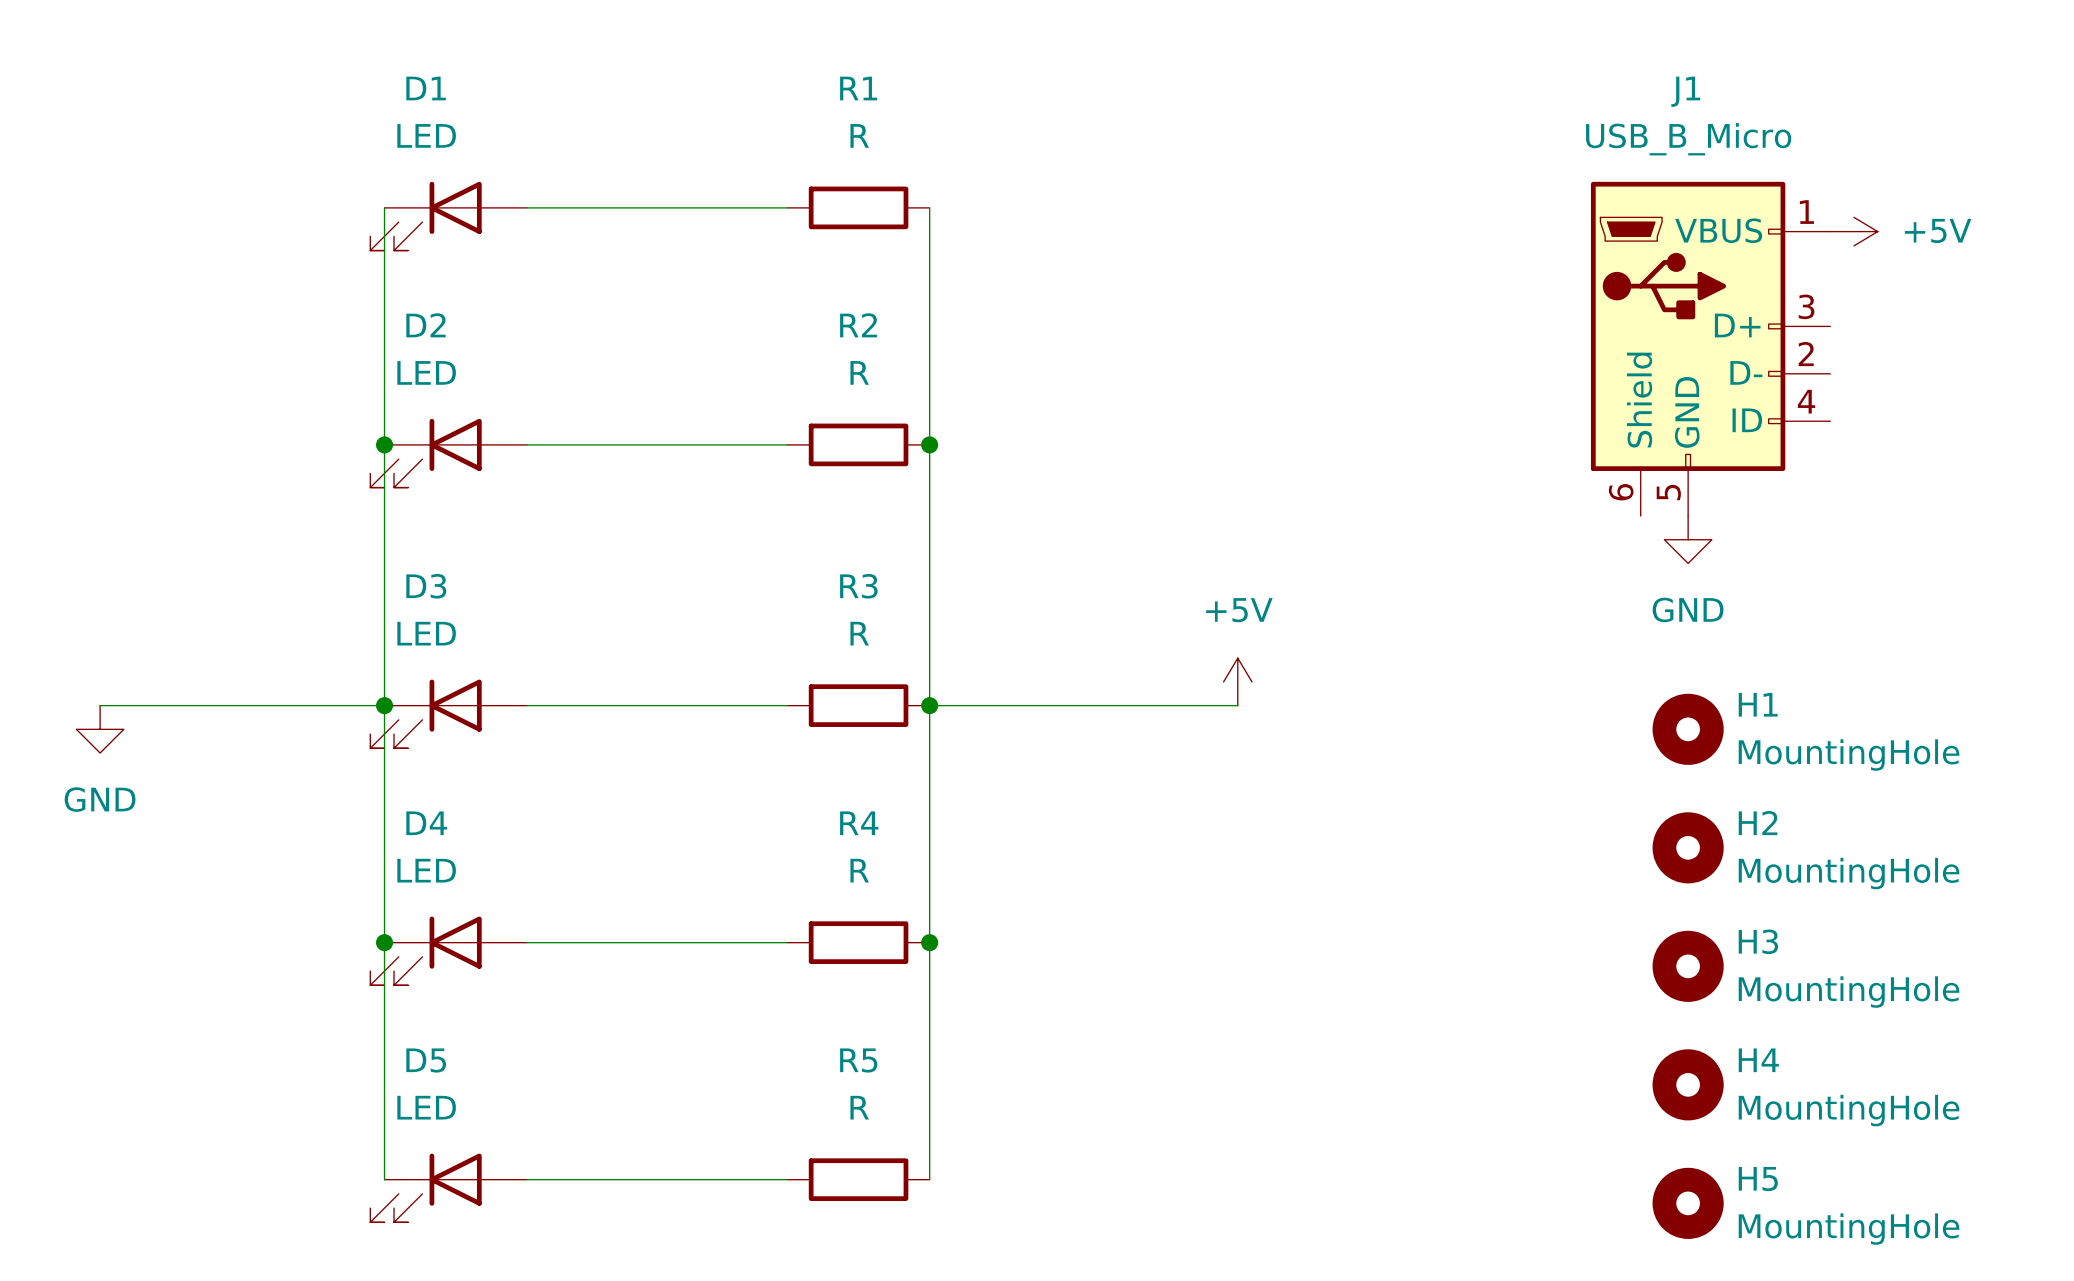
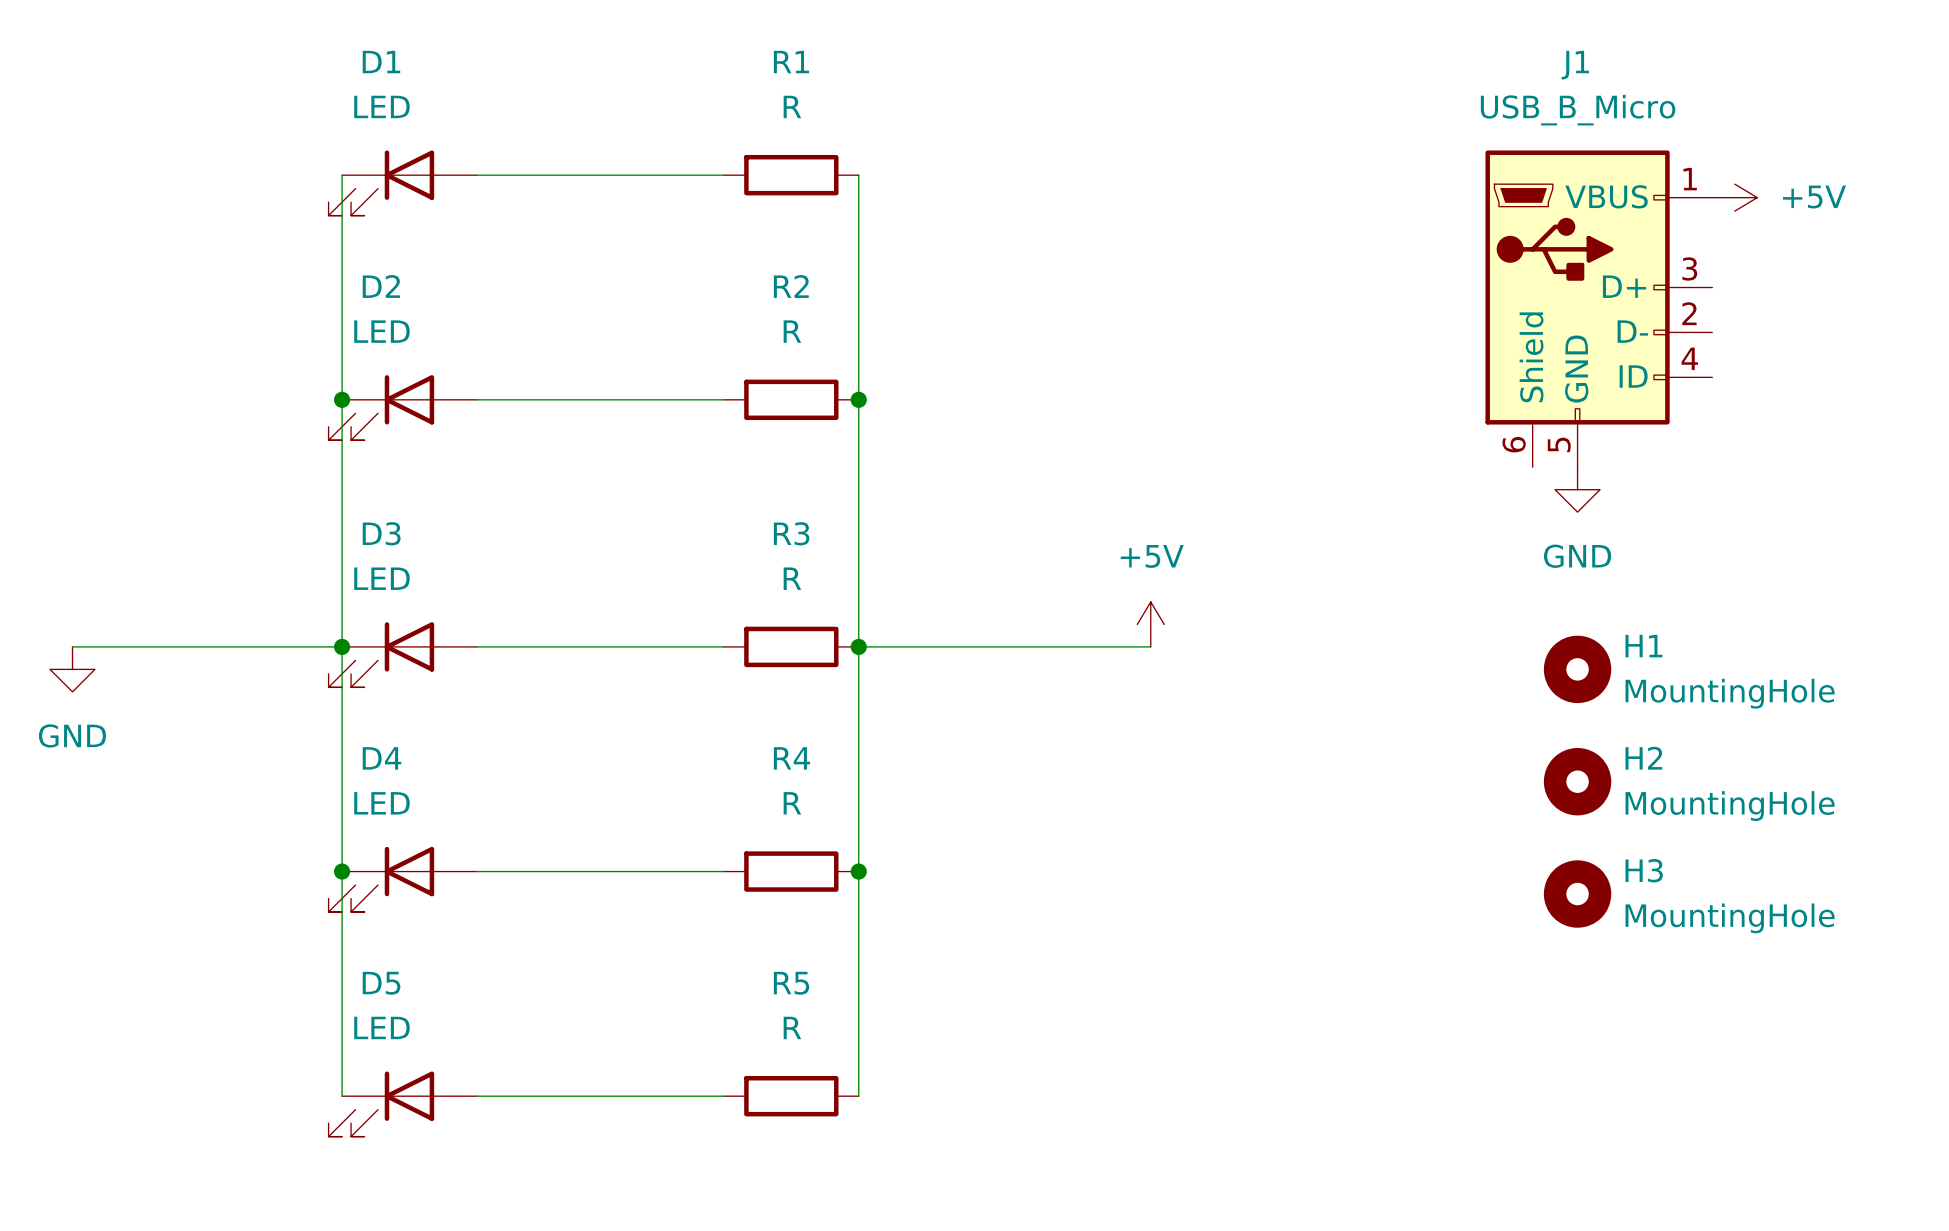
H4: MountingHole (1688, 1084) -> none
H5: MountingHole (1688, 1203) -> none

